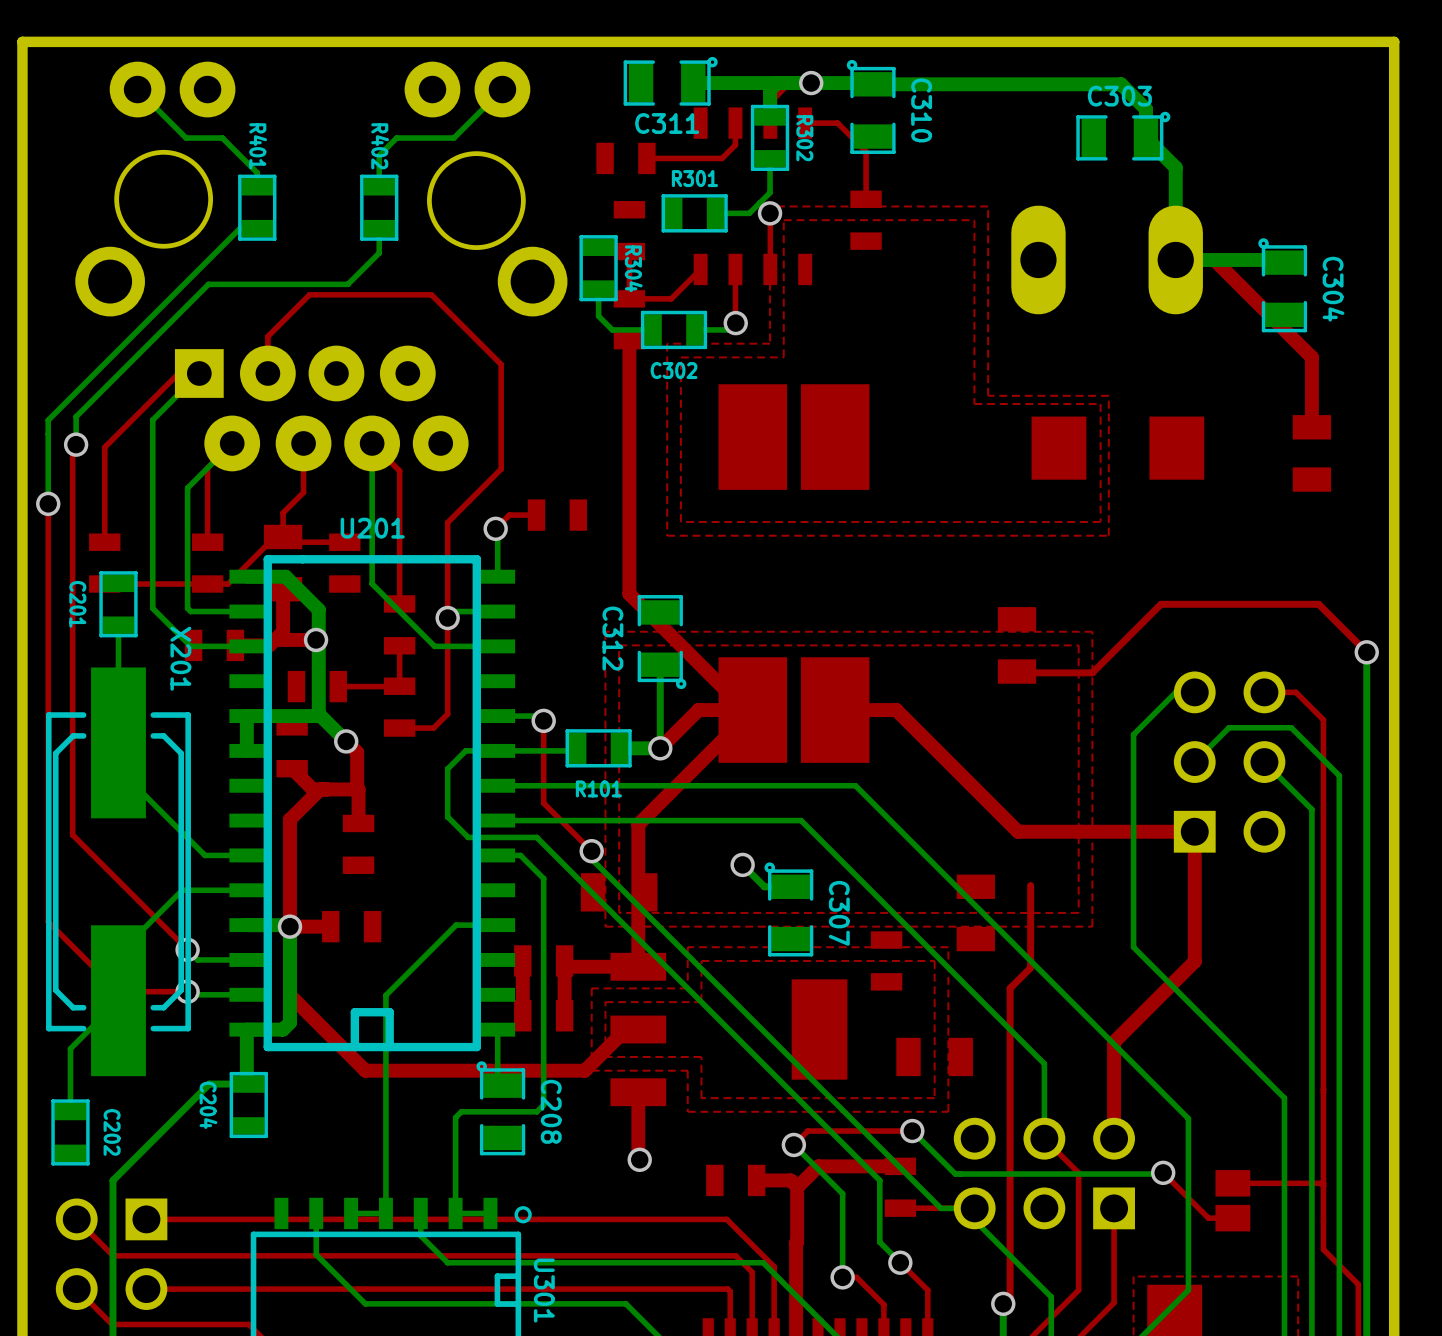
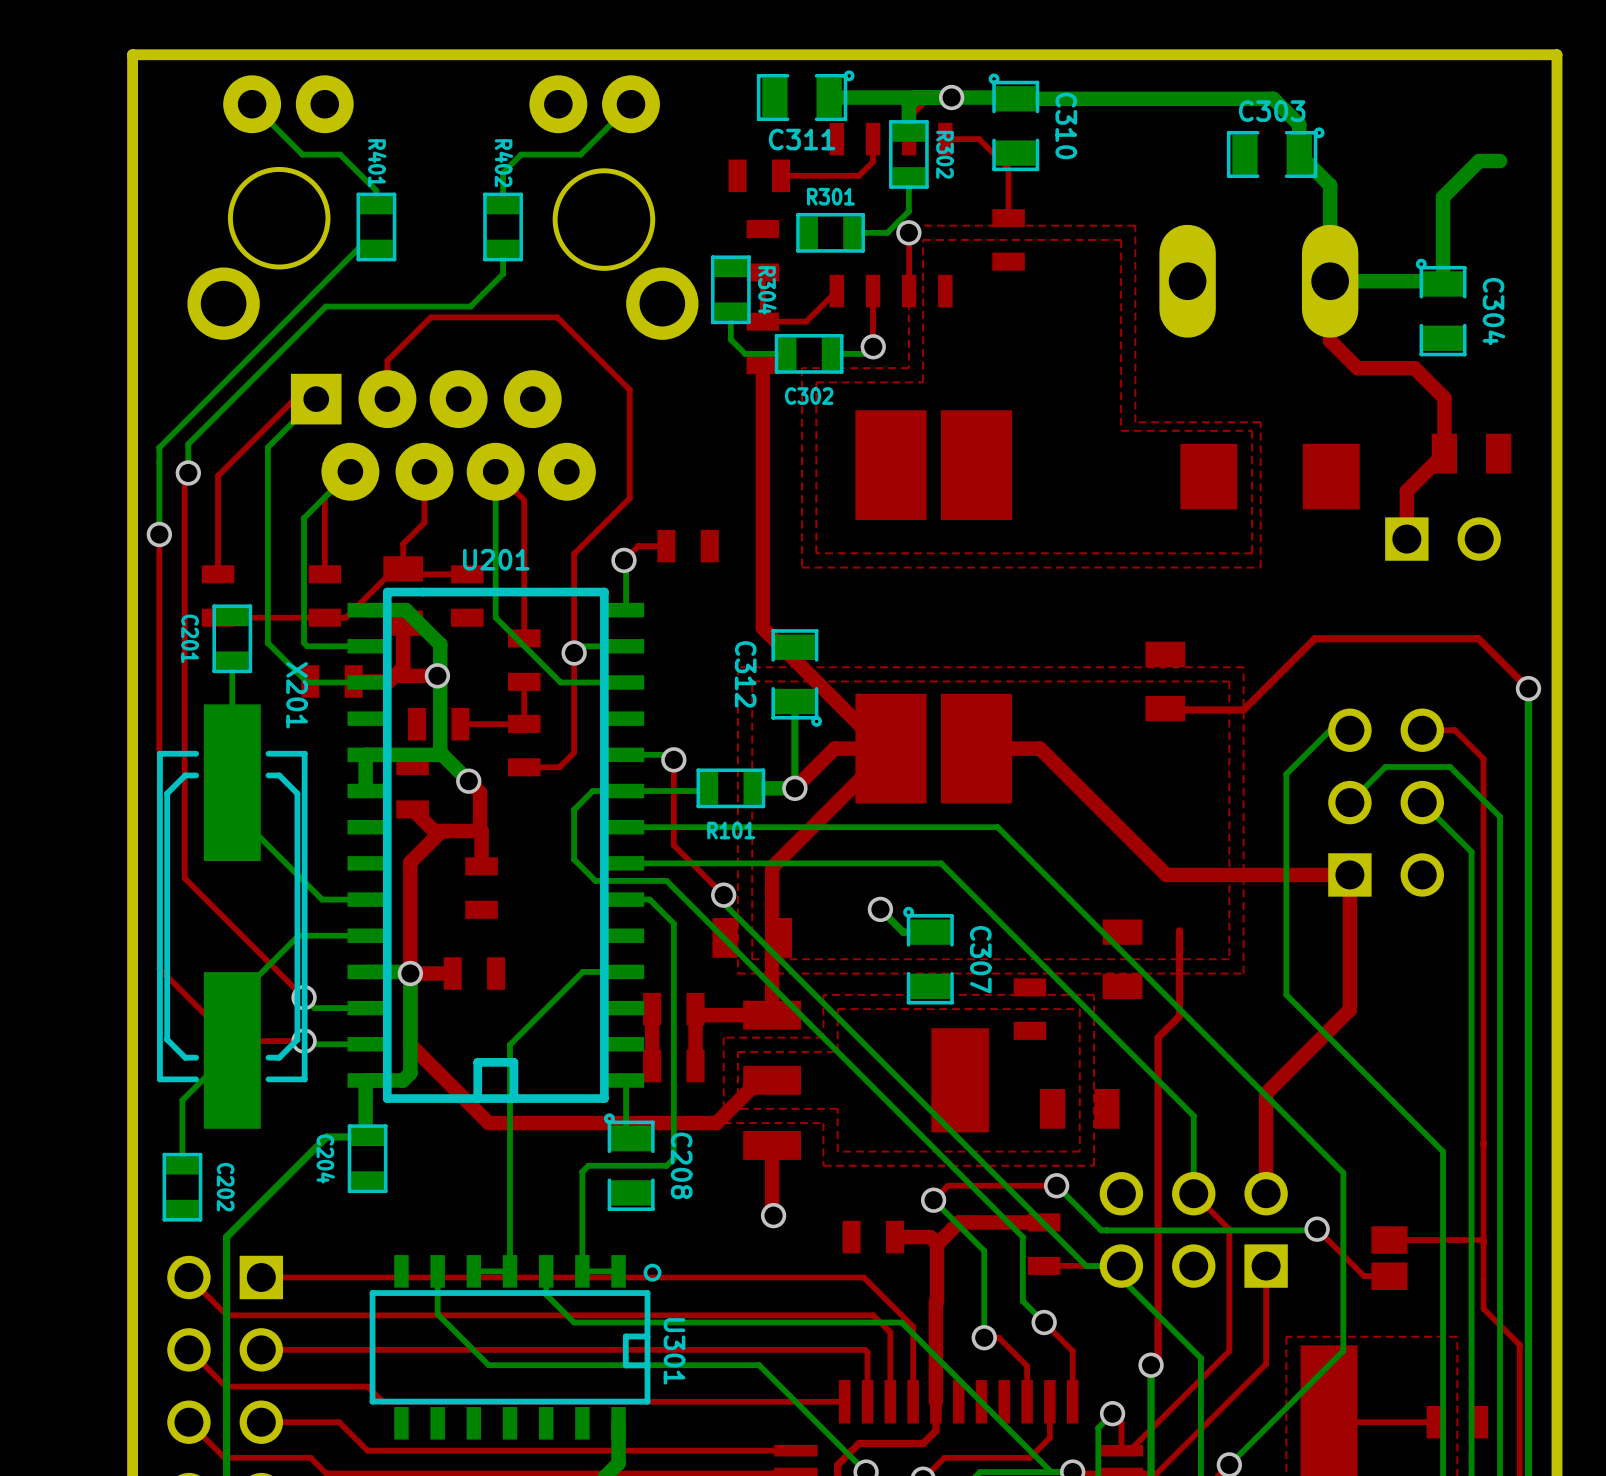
bottom track: none -> (1500, 161) (1479, 161) (1443, 197) (1443, 283)
top track: (1175, 259) (1214, 259) (1311, 357) (1311, 427) -> (1330, 281) (1330, 340) (1357, 368) (1414, 368) (1444, 398) (1444, 453) (1406, 491) (1406, 539)
part rotation: 0° (1311, 453) -> 90° clockwise (1471, 453)
part: none -> (1443, 539)

